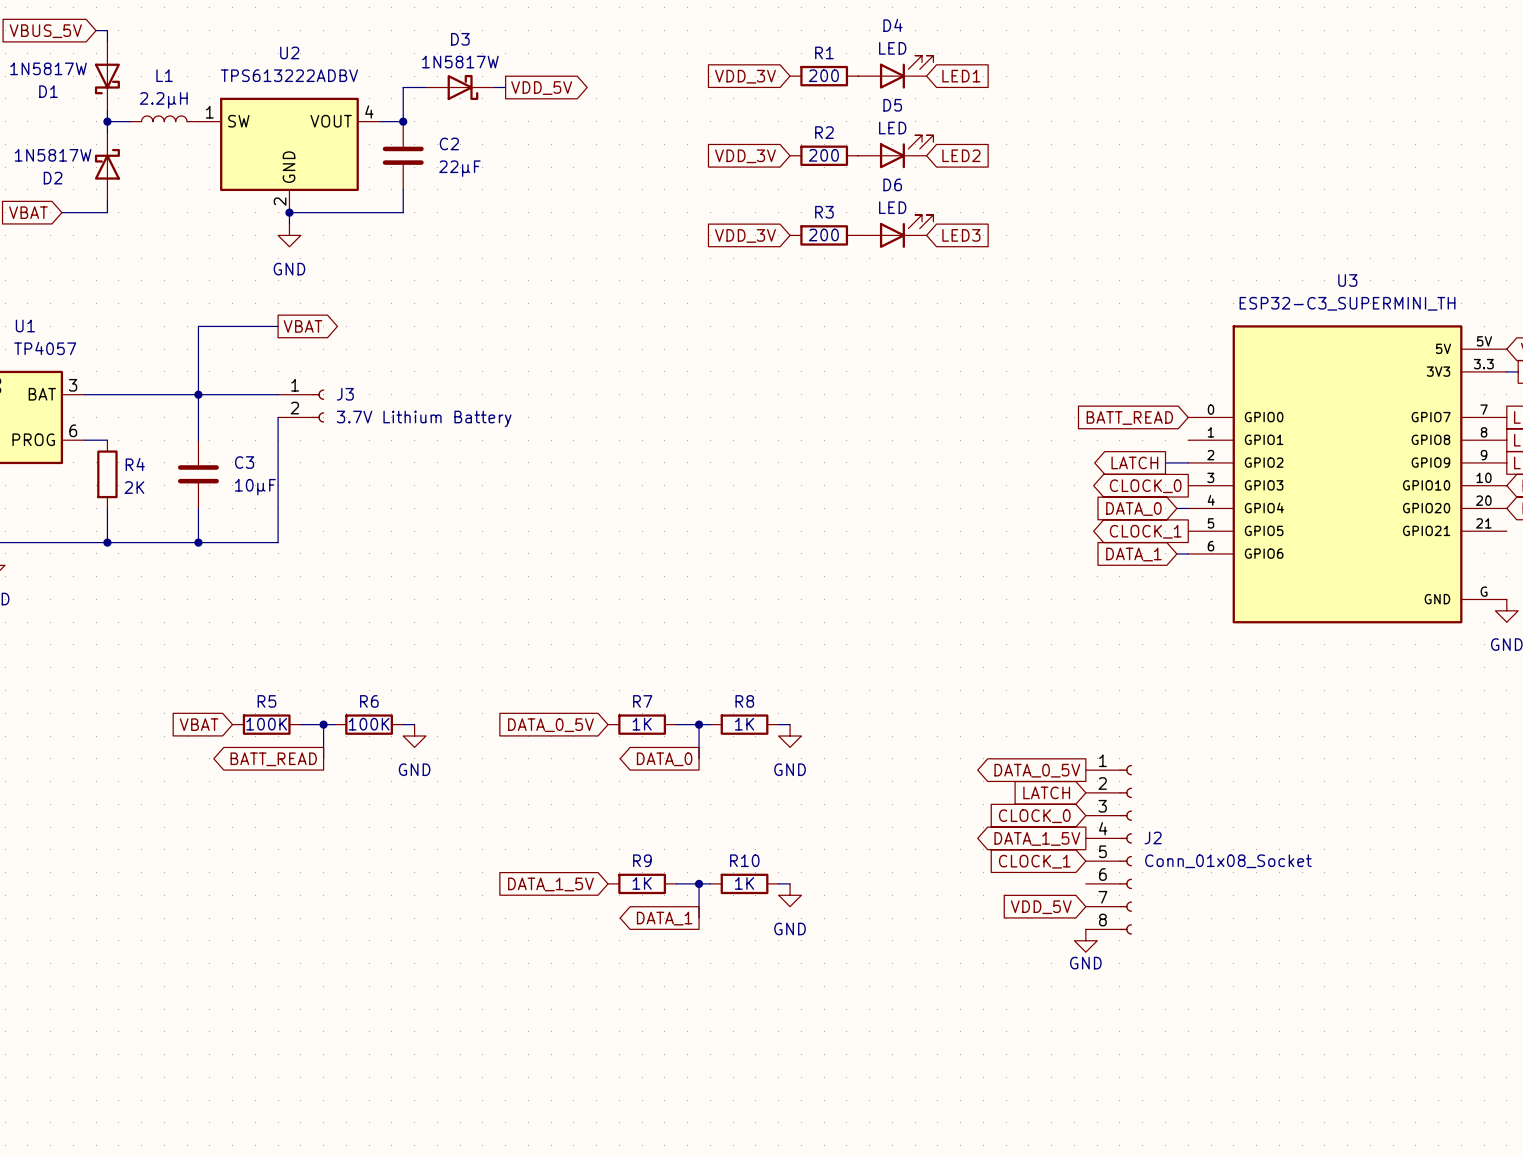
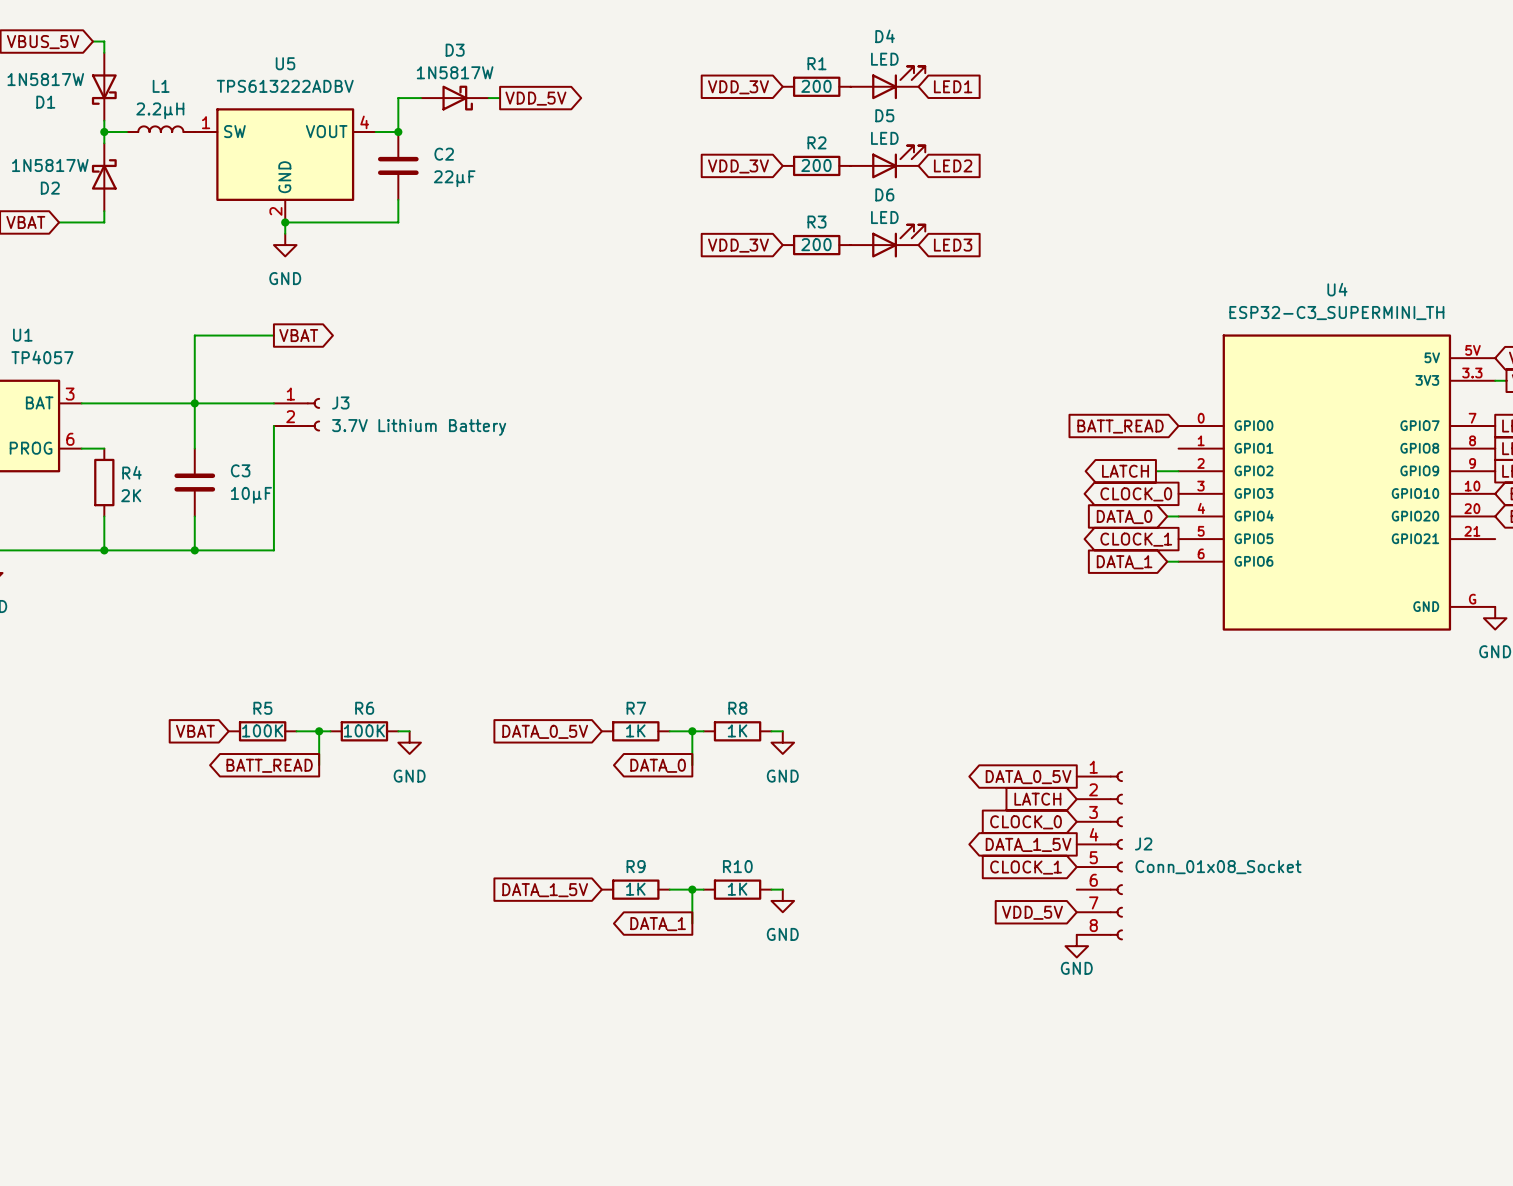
U2 name: U2 (289, 52) -> U5 (285, 63)
U3 name: U3 (1347, 280) -> U4 (1337, 289)

